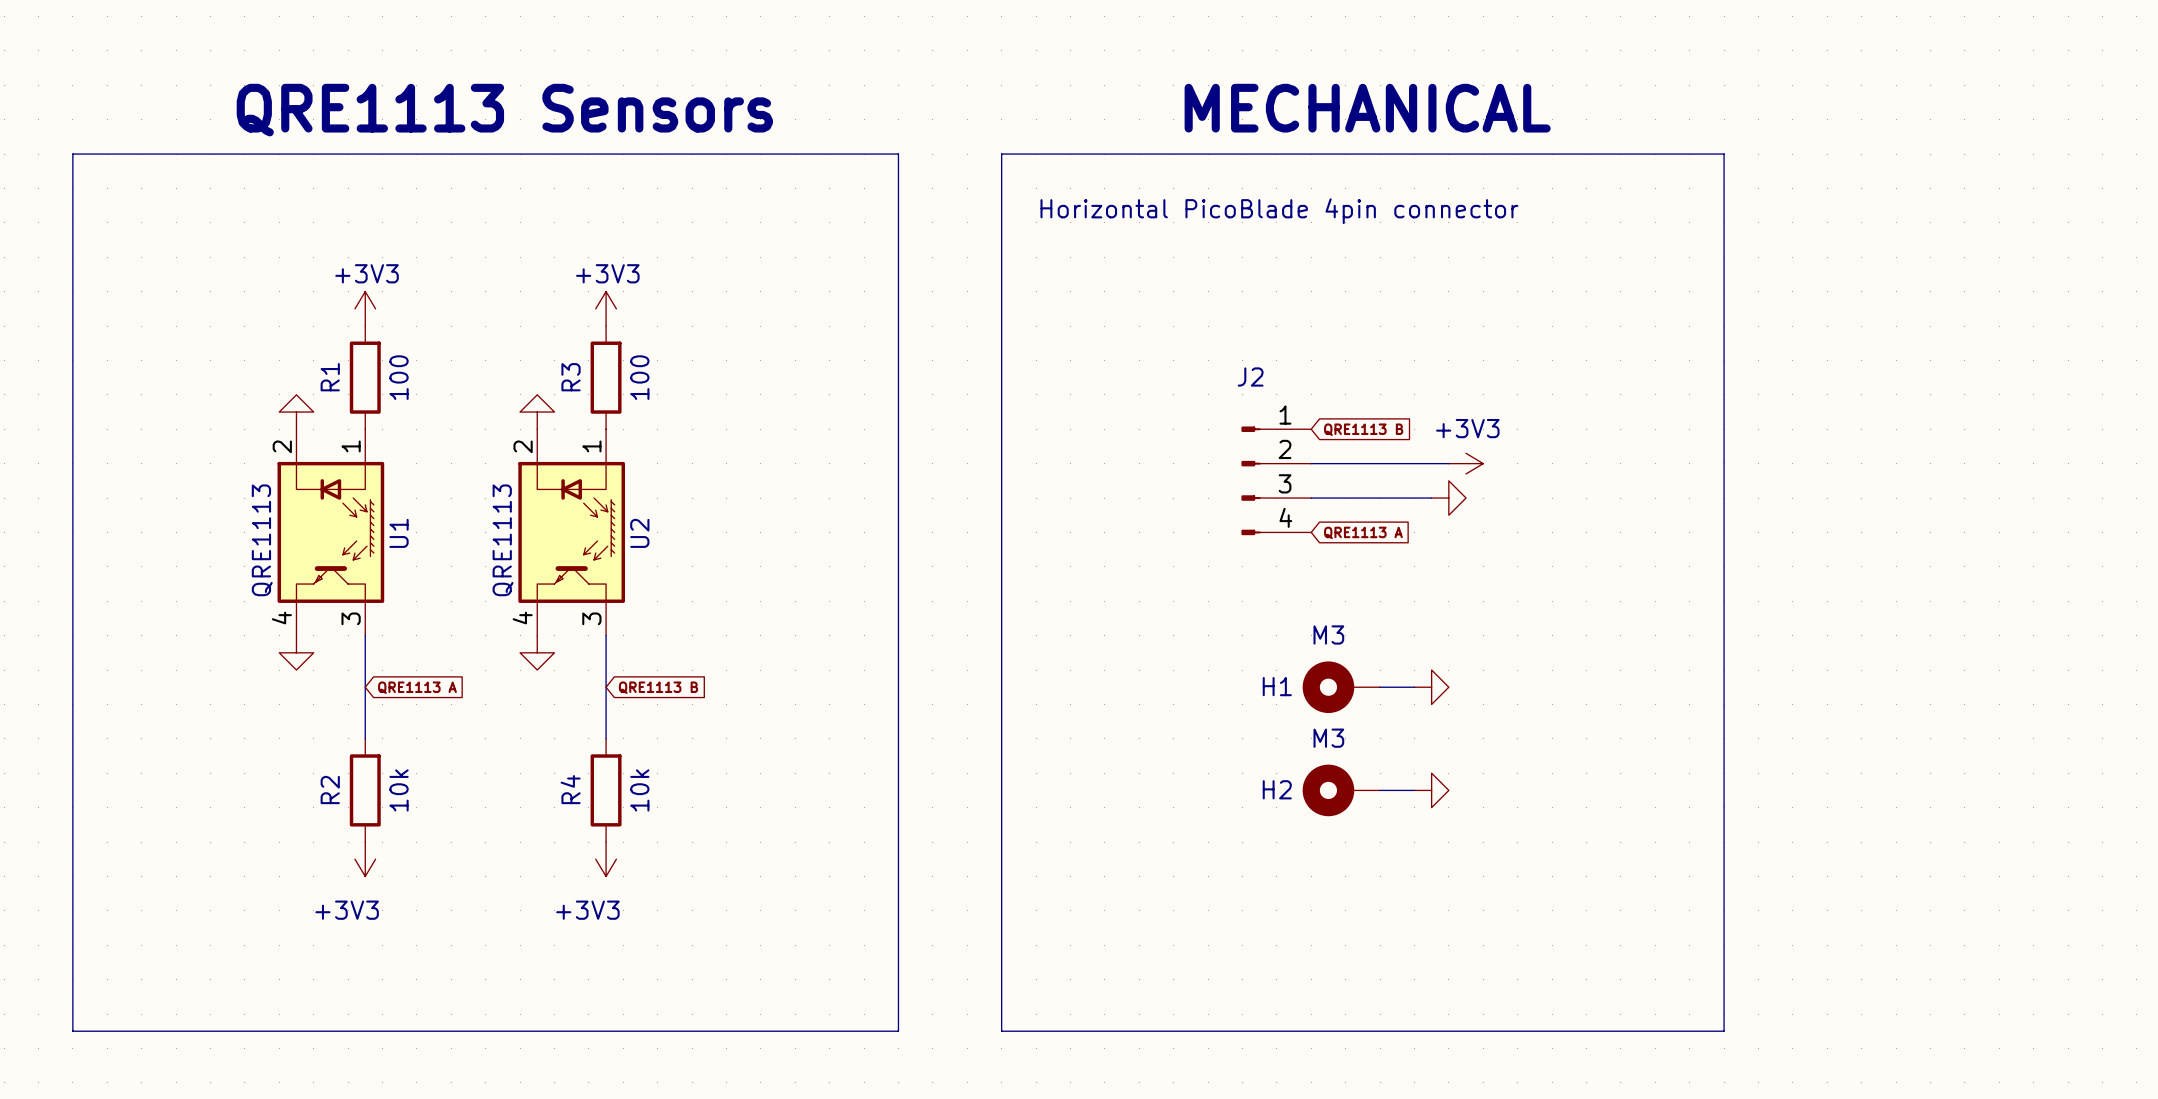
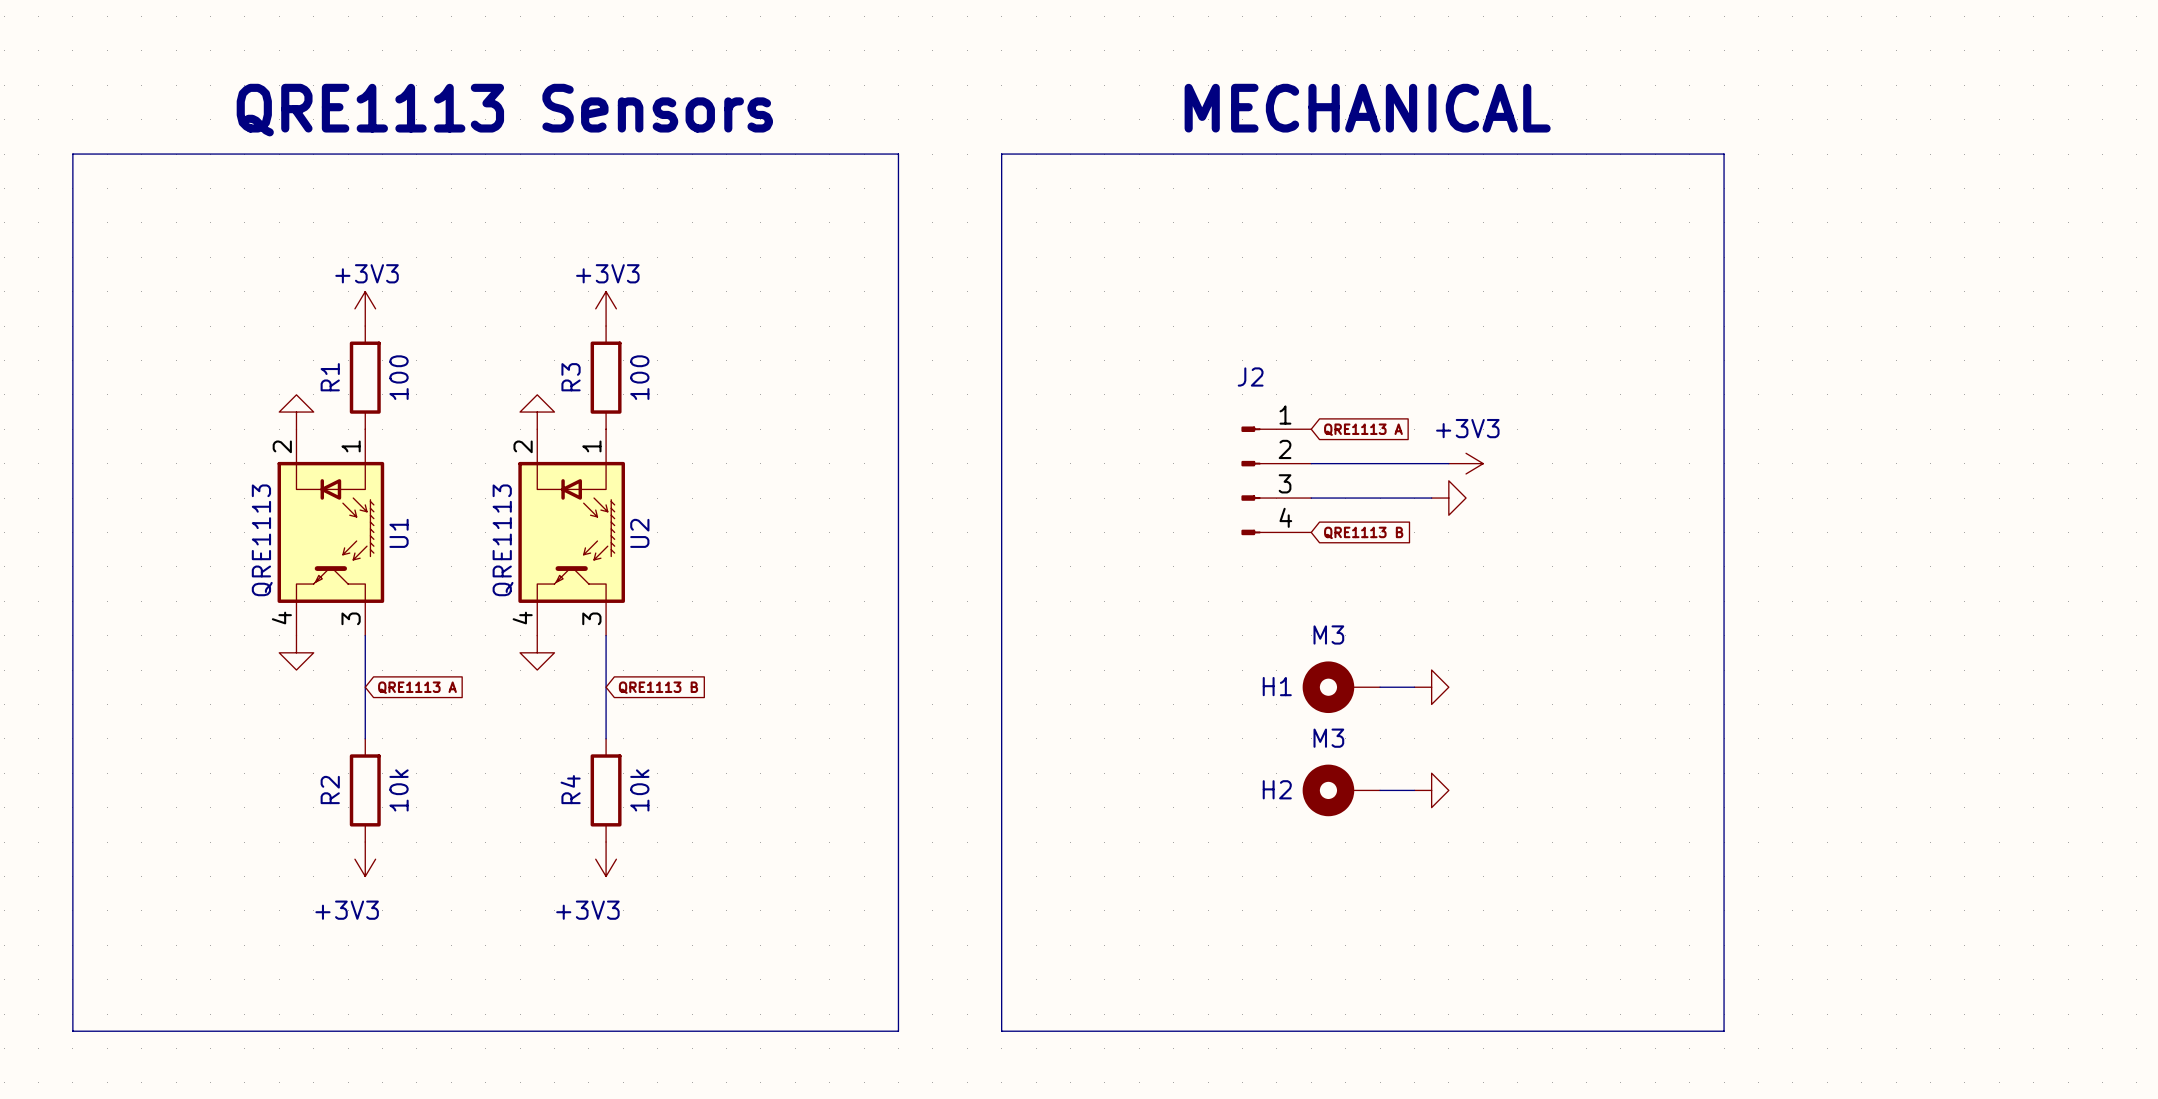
text: Horizontal PicoBlade 4pin connector (1279, 211) -> none
global label: QRE1113 B (1363, 429) -> QRE1113 A (1363, 429)
global label: QRE1113 A (1363, 532) -> QRE1113 B (1363, 532)

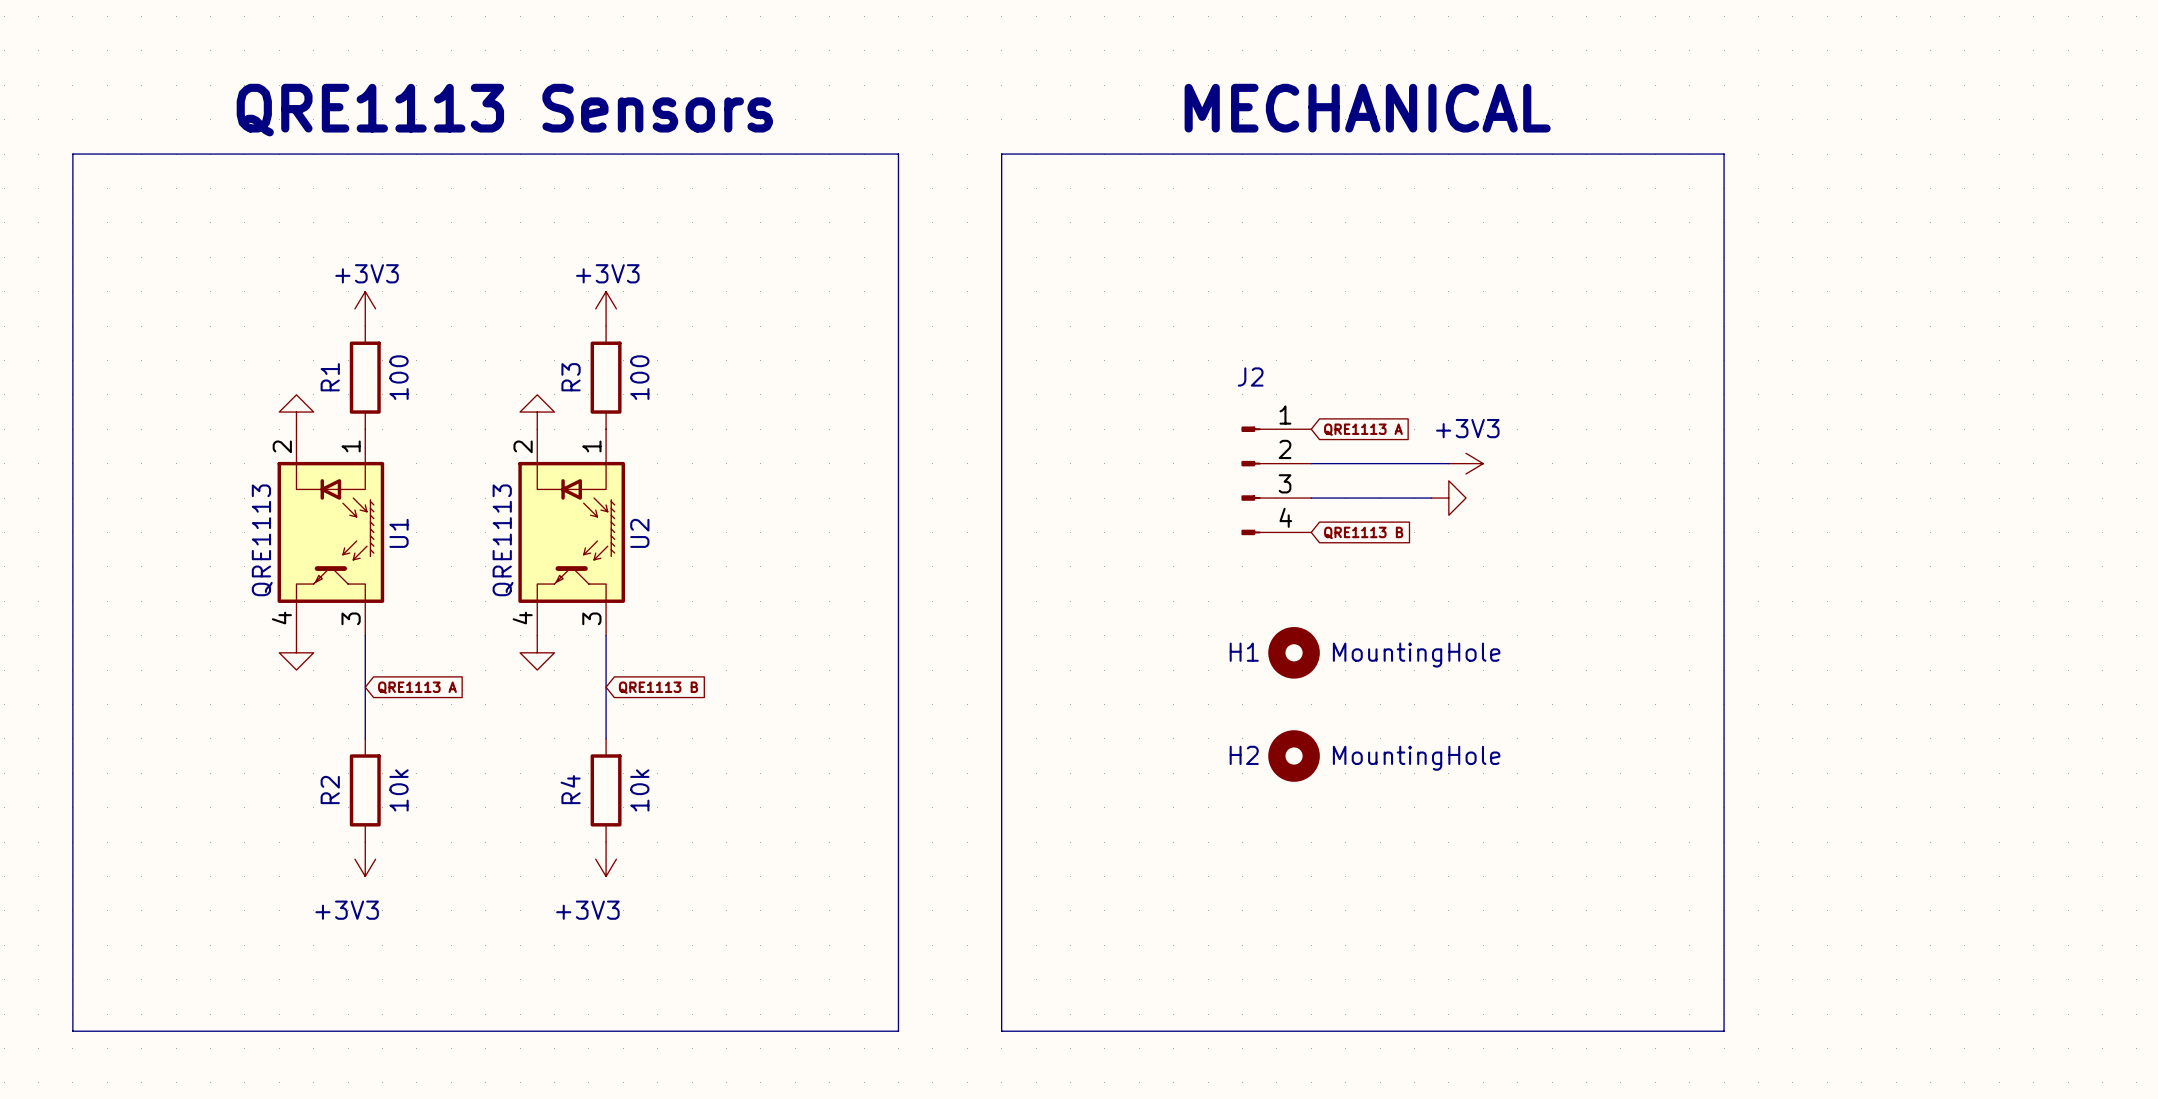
H1 value: M3 (1328, 634) -> MountingHole (1416, 655)
H1 symbol: [1302, 661, 1381, 714] -> [1268, 627, 1320, 679]
wire: (1380, 687) (1414, 687) -> none
power symbol: (1431, 687) -> none
H2 value: M3 (1328, 738) -> MountingHole (1416, 758)
H2 symbol: [1302, 764, 1381, 817] -> [1268, 730, 1320, 782]
wire: (1380, 790) (1414, 790) -> none
power symbol: (1431, 790) -> none

